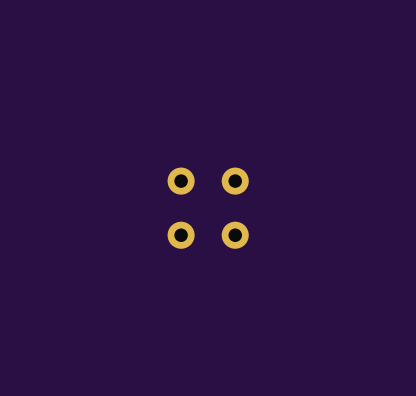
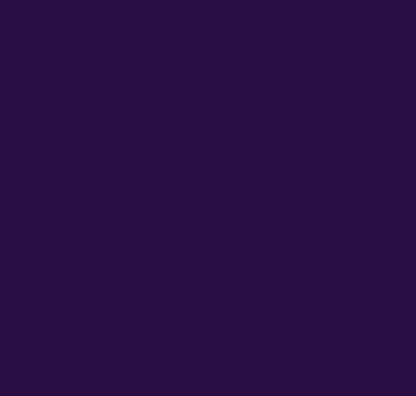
part: (208, 208) -> none

